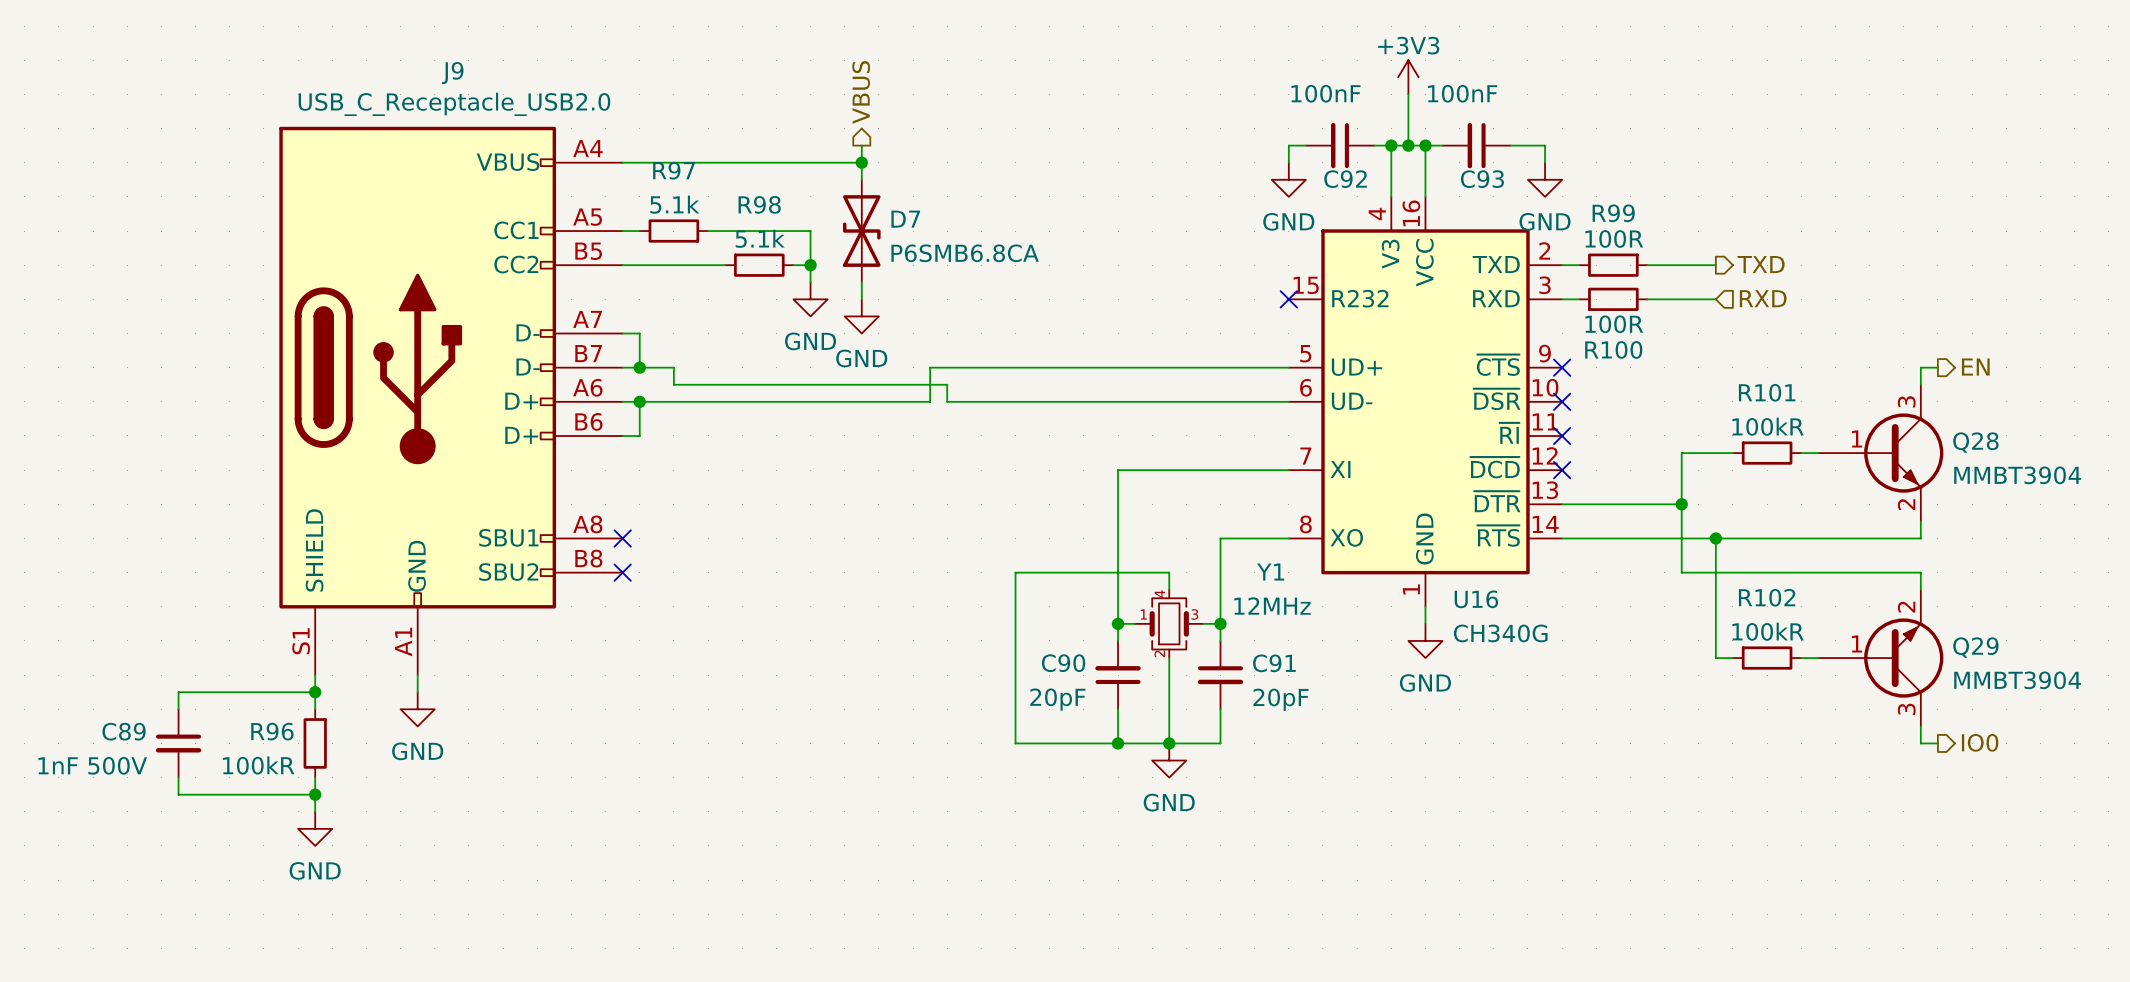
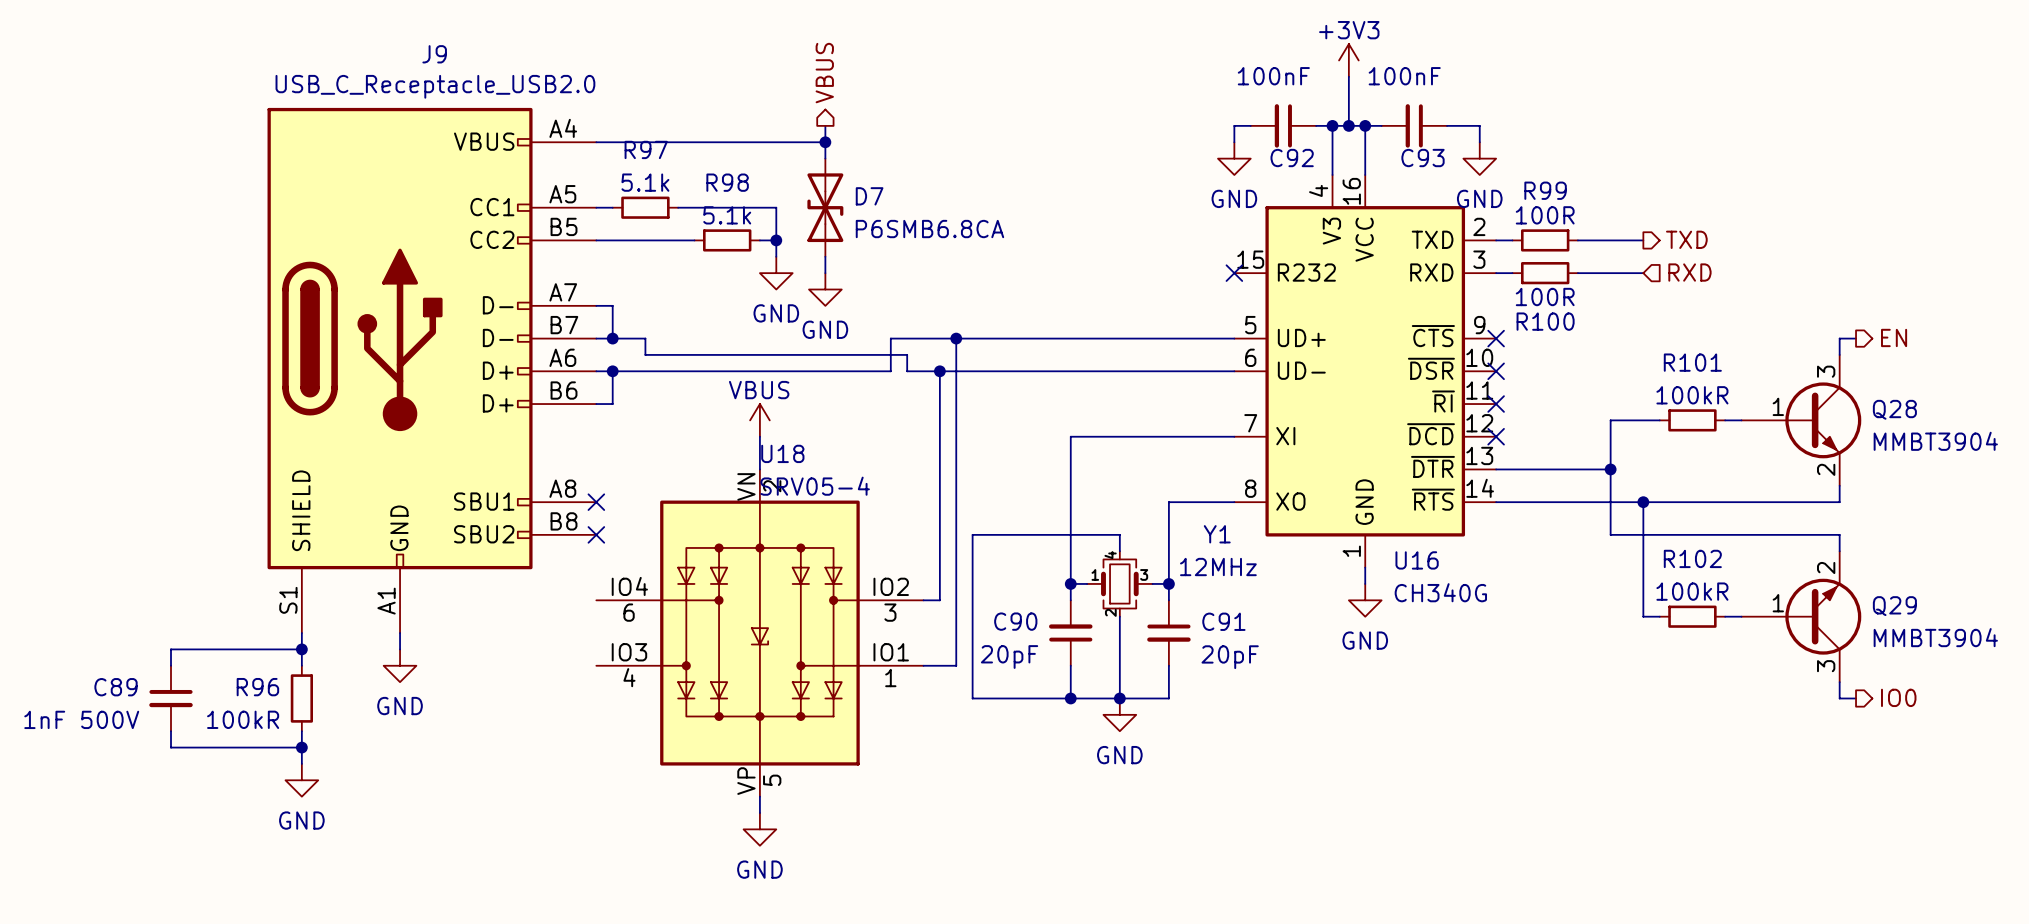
wire: none -> (956, 338) (956, 665) (923, 665)
junction: none -> (956, 338)
wire: none -> (939, 371) (939, 600) (923, 600)
junction: none -> (939, 371)
power symbol: none -> VBUS (759, 420)
wire: none -> (759, 436) (759, 469)
U18: none -> SRV05-4 (759, 633)
wire: none -> (759, 796) (759, 813)
power symbol: none -> GND (759, 829)

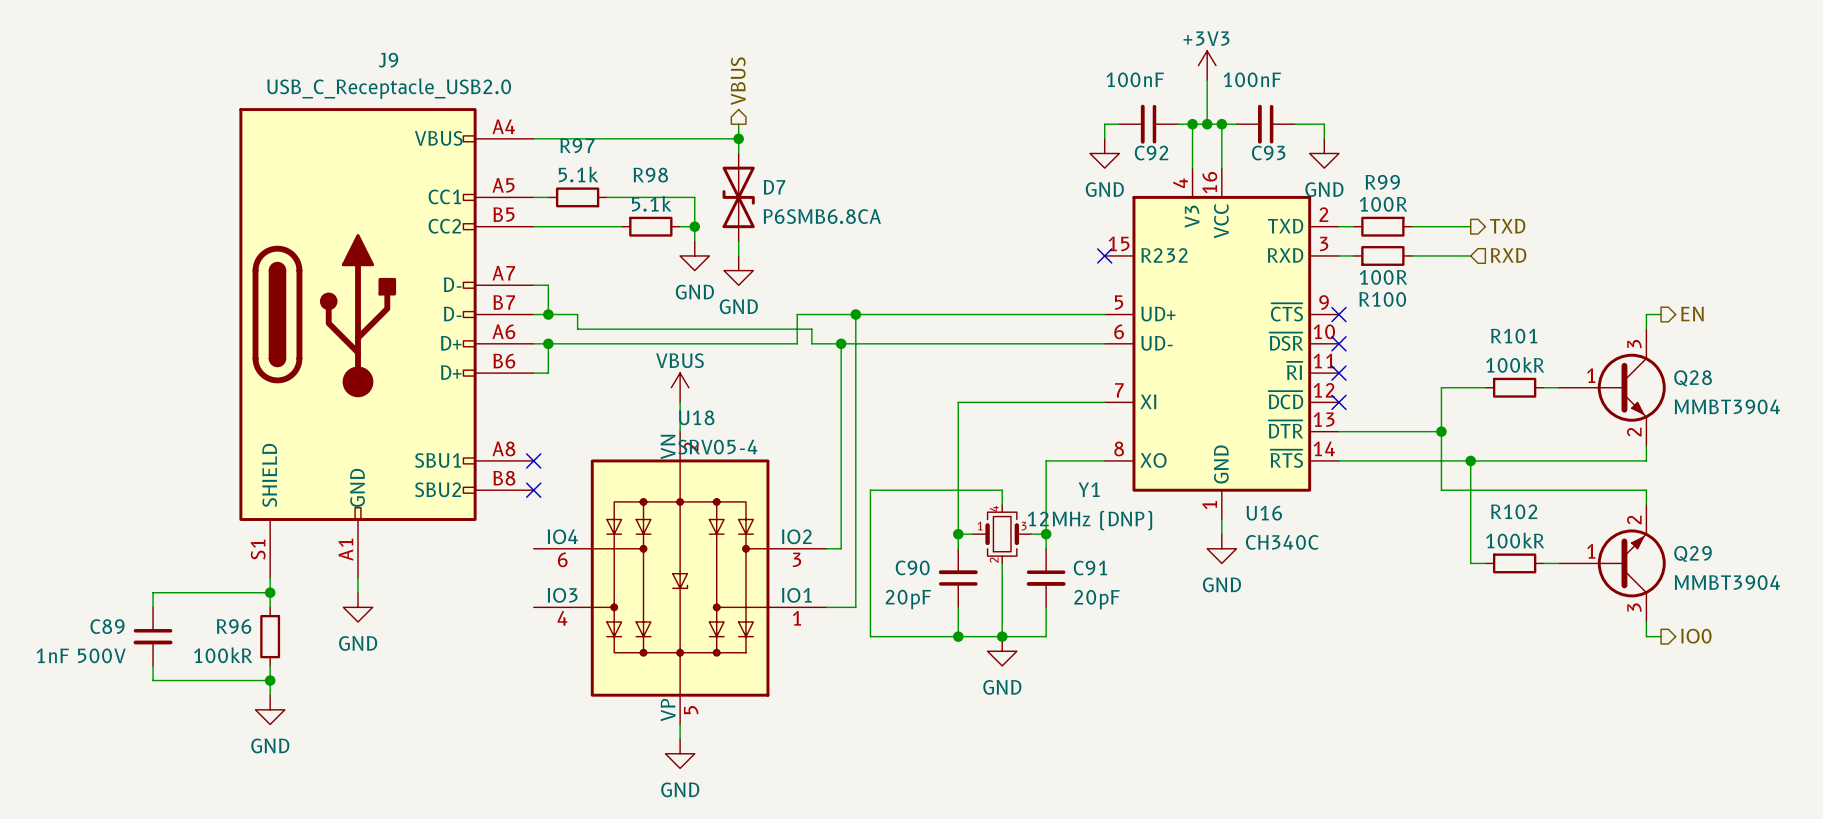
Y1 value: 12MHz (1218, 567) -> 12MHz (DNP) (1090, 520)
U16 value: CH340G (1440, 592) -> CH340C (1282, 542)

